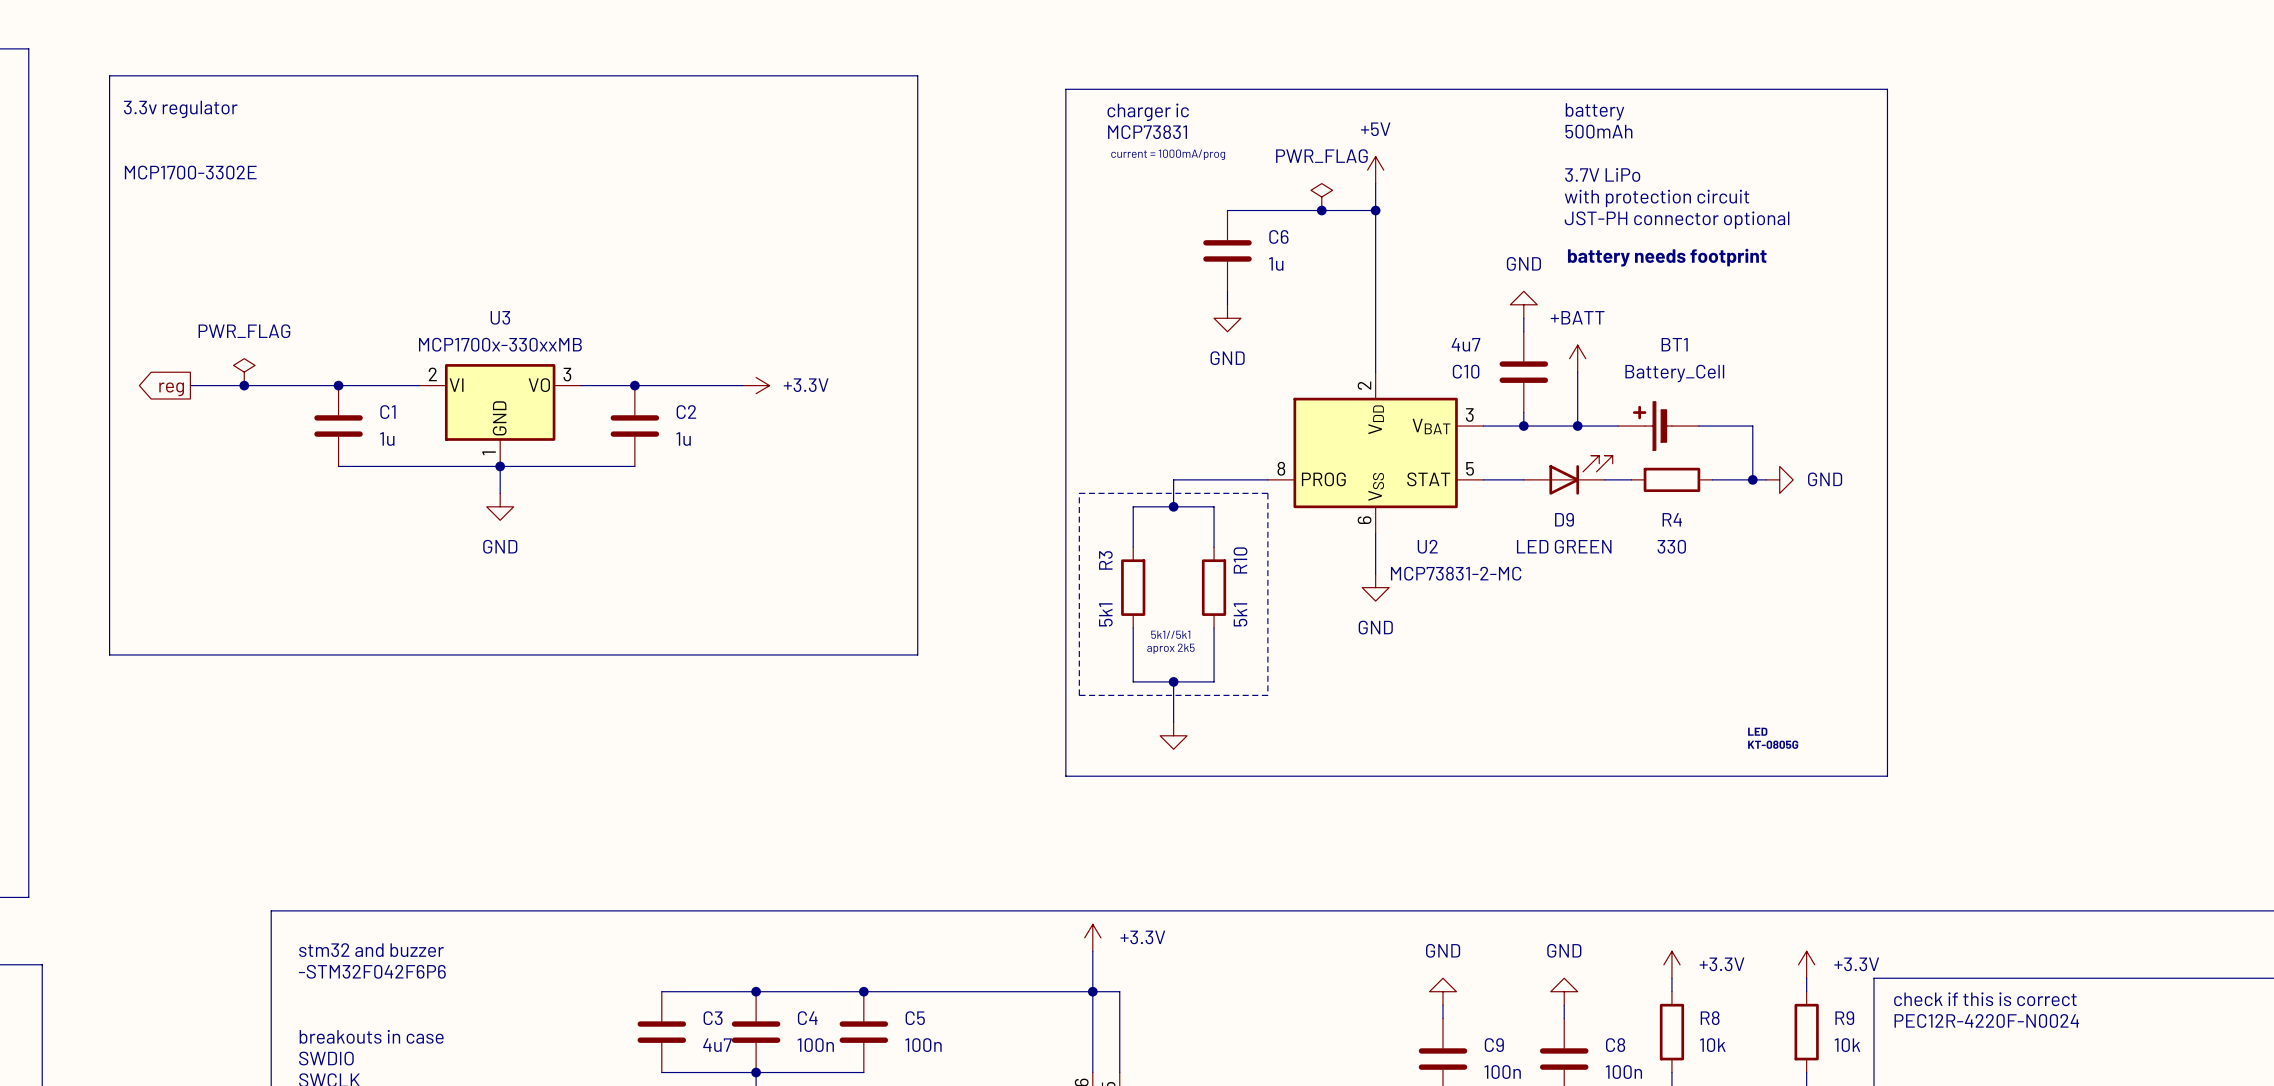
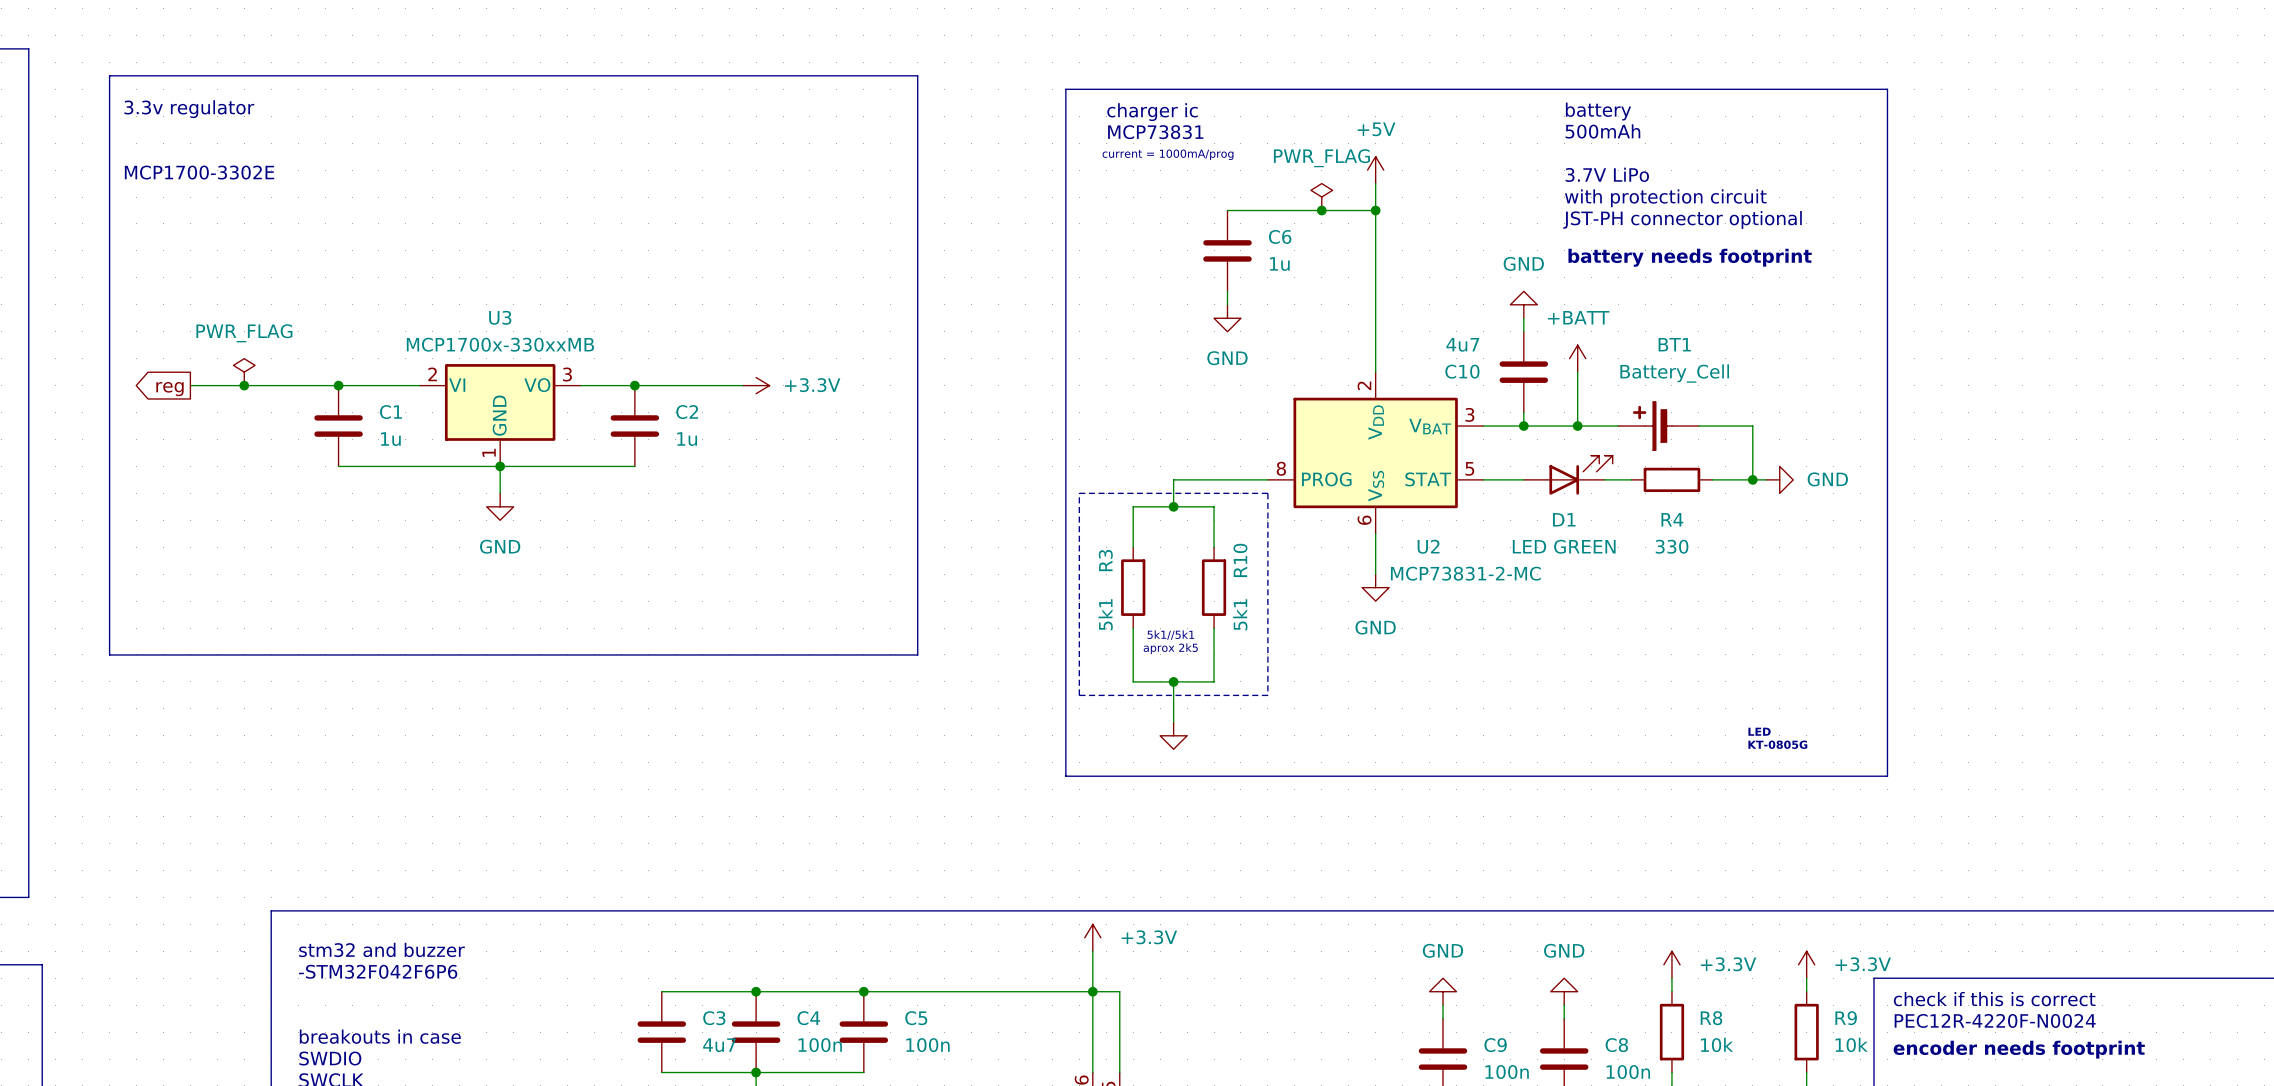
D9 name: D9 (1564, 519) -> D1 (1564, 519)
text: none -> encoder needs footprint (2019, 1049)

